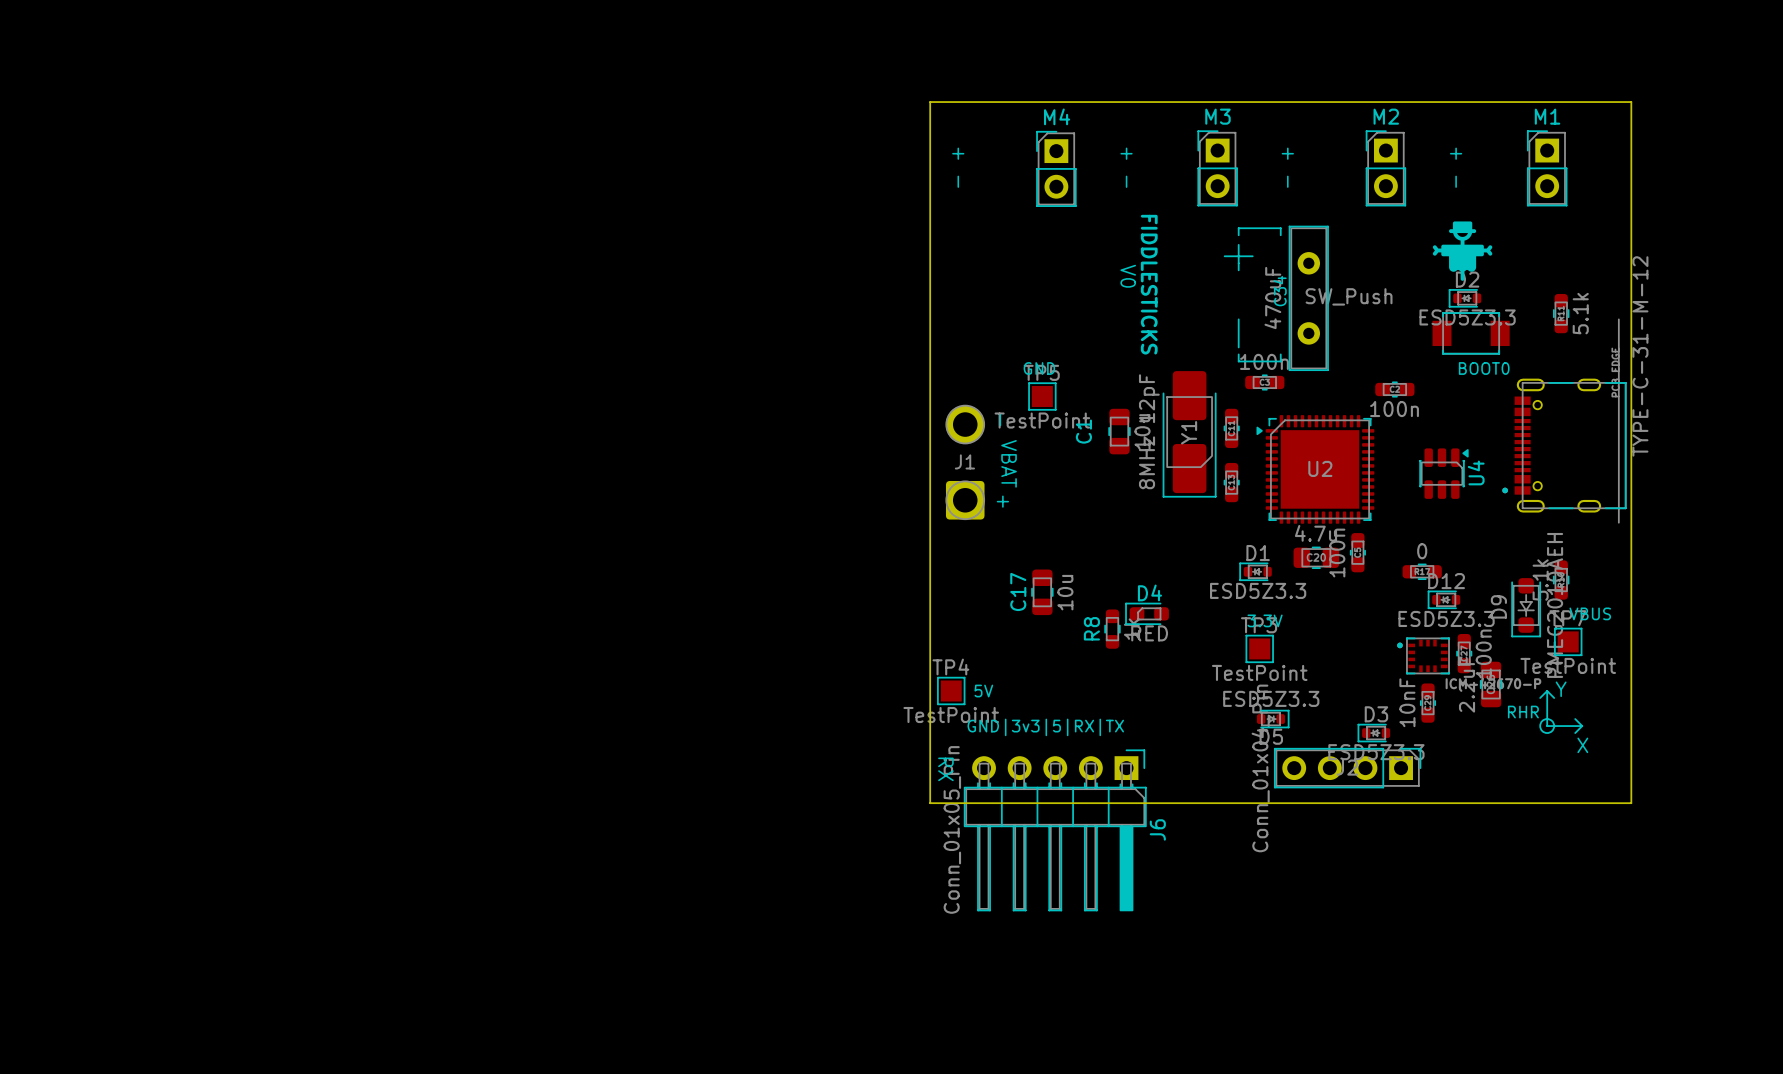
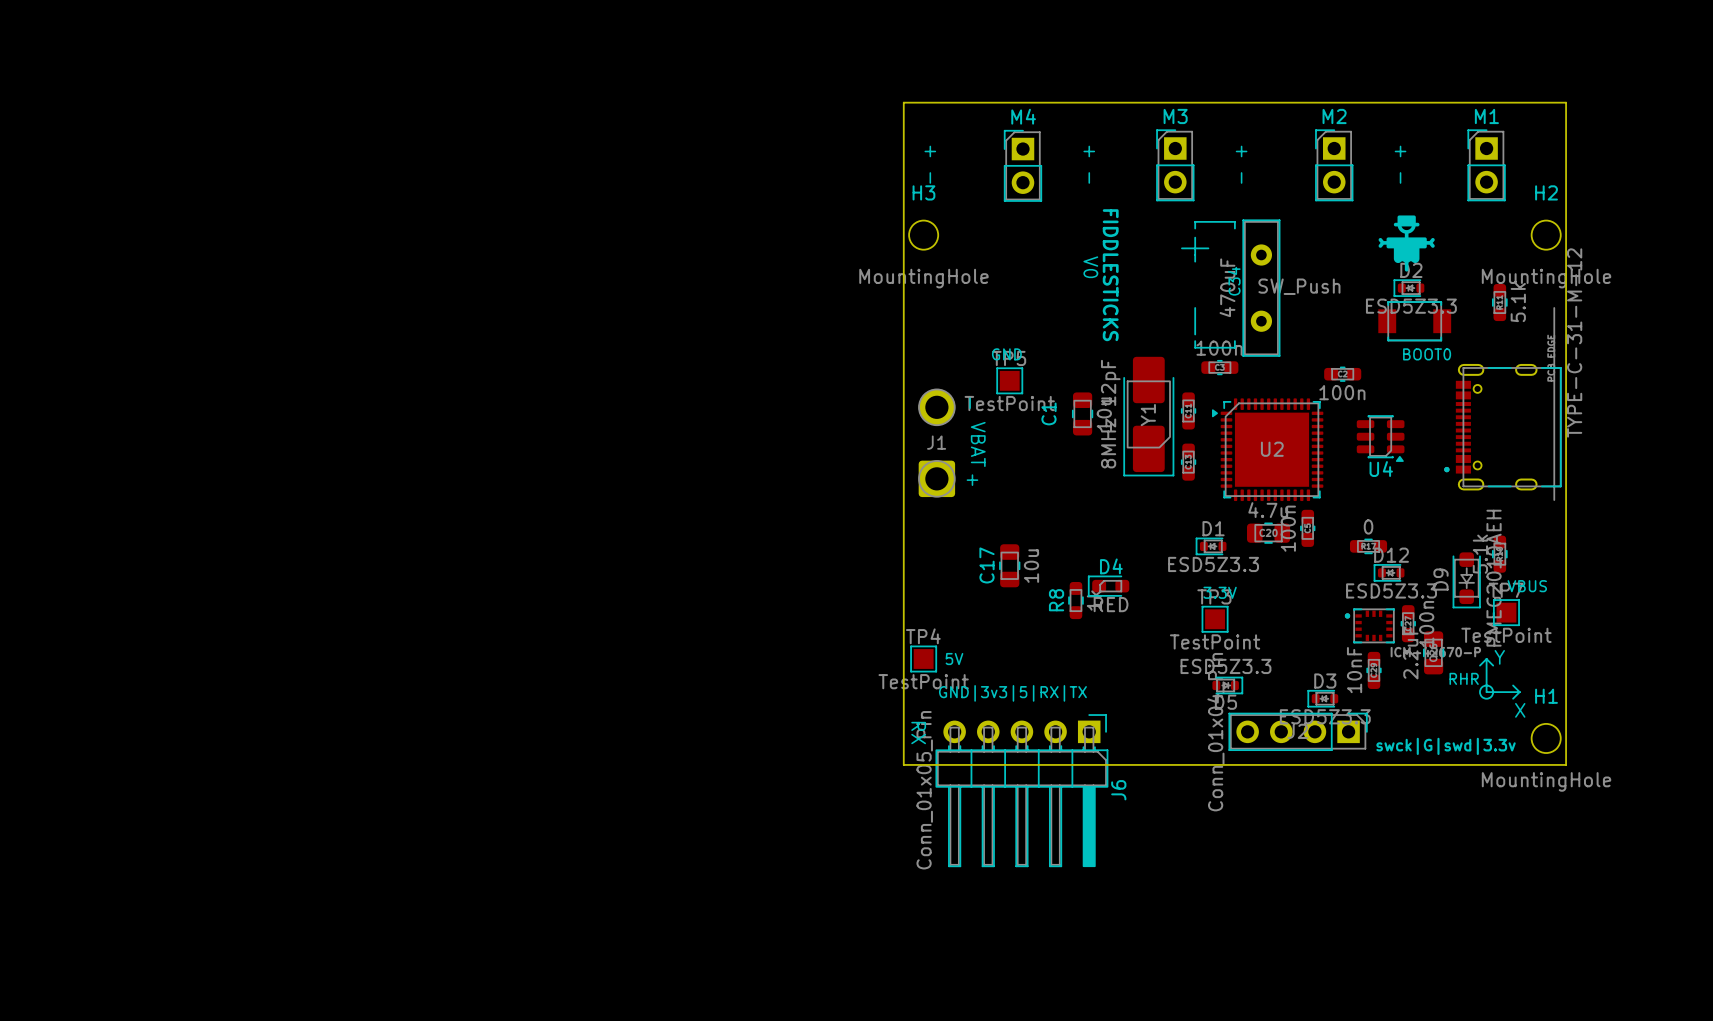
H3: none -> MountingHole (923, 235)
H2: none -> MountingHole (1546, 235)
U4 rotation: 0° (1443, 473) -> 90° clockwise (1380, 438)
H1: none -> MountingHole (1546, 738)
text: none -> swck|G|swd|3.3v (1446, 746)

